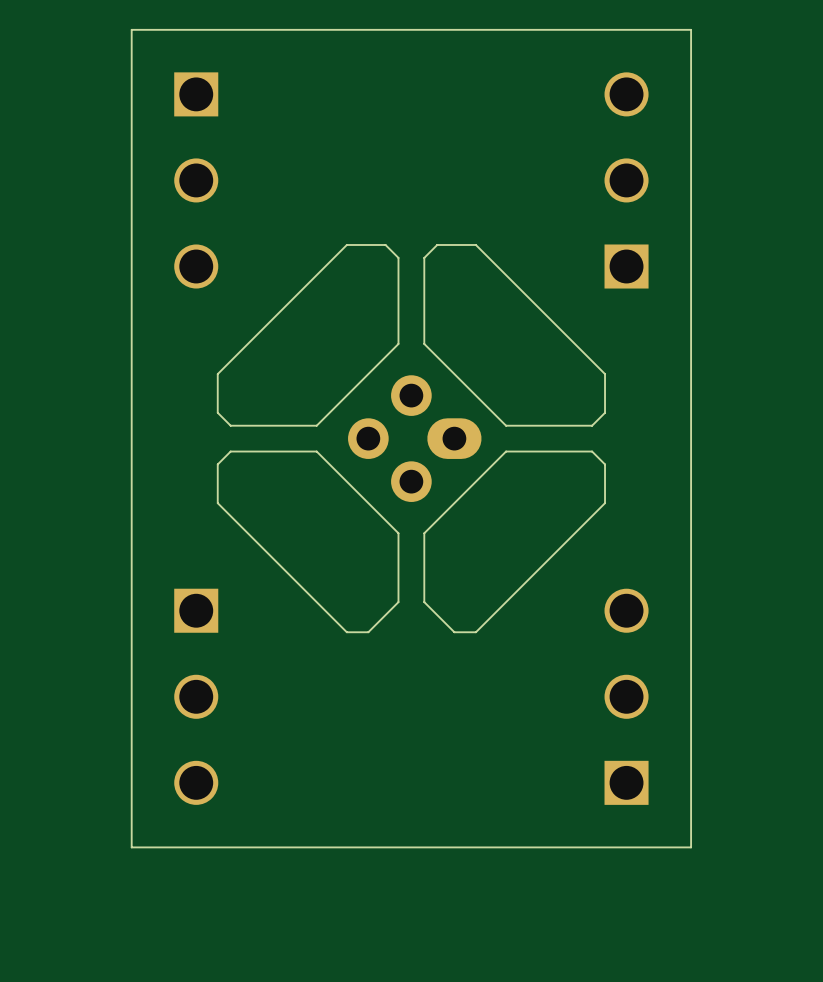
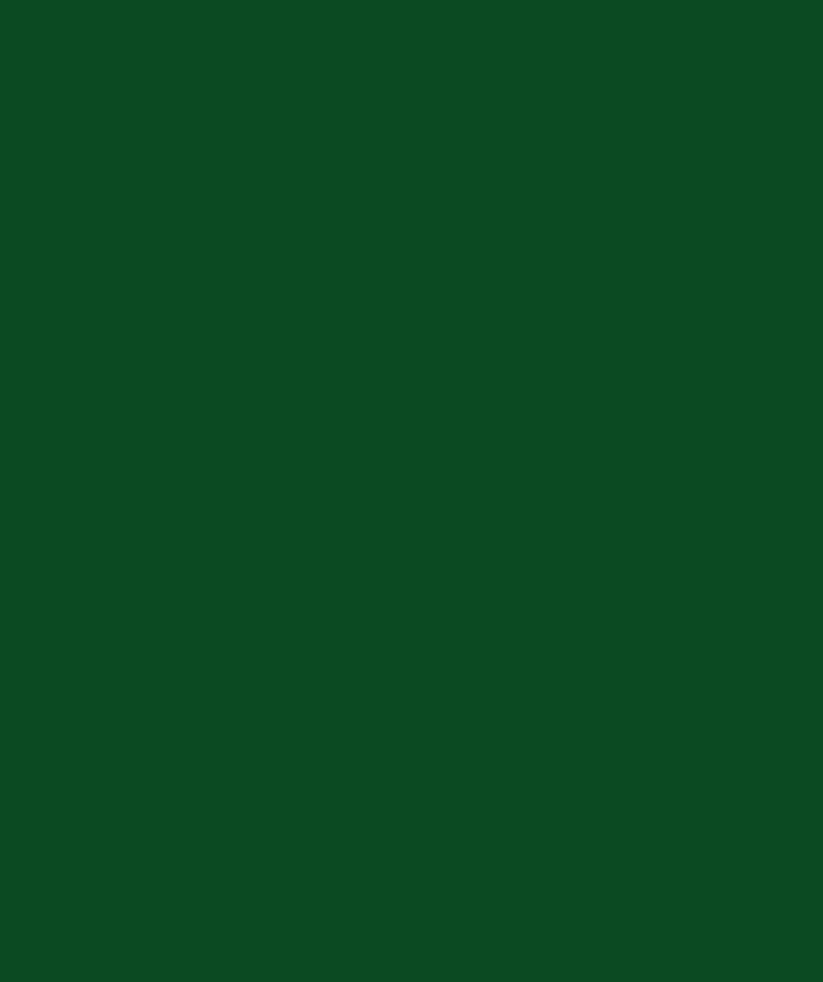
board edge: (691, 29) (691, 847) (131, 847) (131, 29) (691, 29) -> none
part: (196, 180) -> none
part: (626, 180) -> none
board edge: (385, 244) (398, 257) (398, 343) (316, 425) (230, 425) (217, 412) (217, 374) (346, 244) (385, 244) -> none
board edge: (475, 244) (437, 244) (424, 257) (424, 343) (506, 425) (592, 425) (605, 412) (605, 374) (475, 244) -> none
part: (414, 438) -> none
board edge: (316, 451) (230, 451) (217, 464) (217, 503) (346, 632) (368, 632) (398, 602) (398, 533) (316, 451) -> none
board edge: (592, 451) (605, 464) (605, 503) (475, 632) (454, 632) (424, 602) (424, 533) (506, 451) (592, 451) -> none
part: (196, 696) -> none
part: (626, 696) -> none

